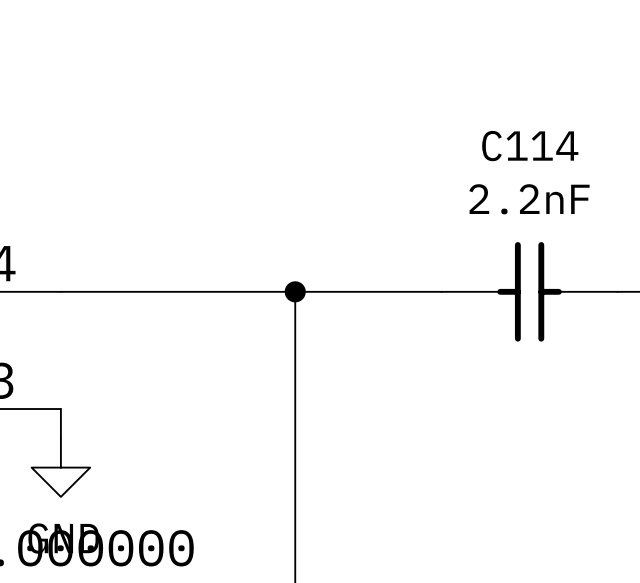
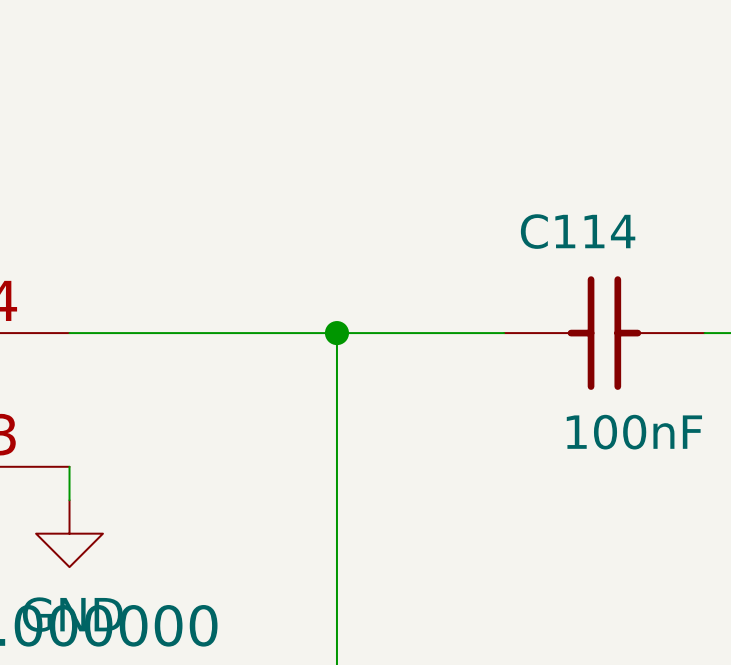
C114 name position: C114 (530, 146) -> C114 (578, 231)
C114 text: 2.2nF (529, 199) -> none
C114 text: none -> 100nF (634, 432)

